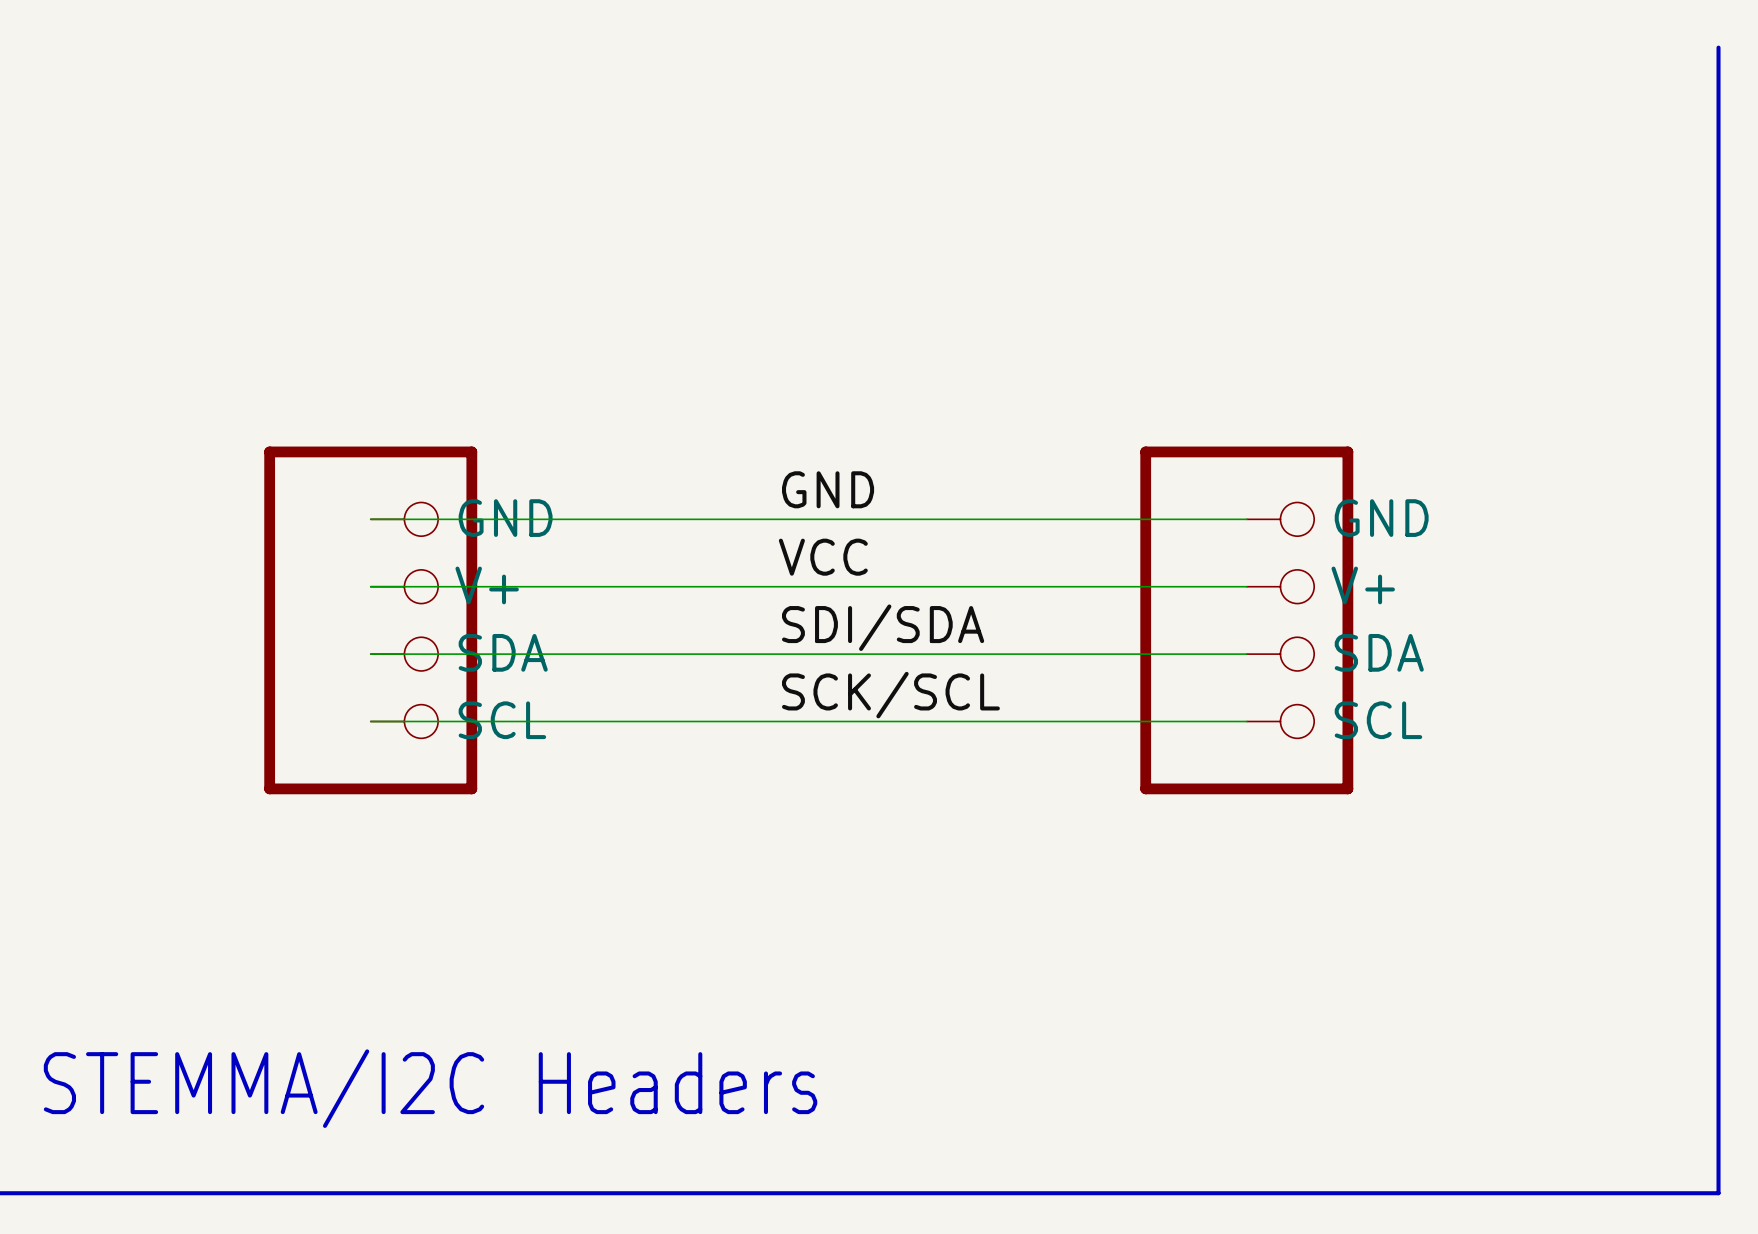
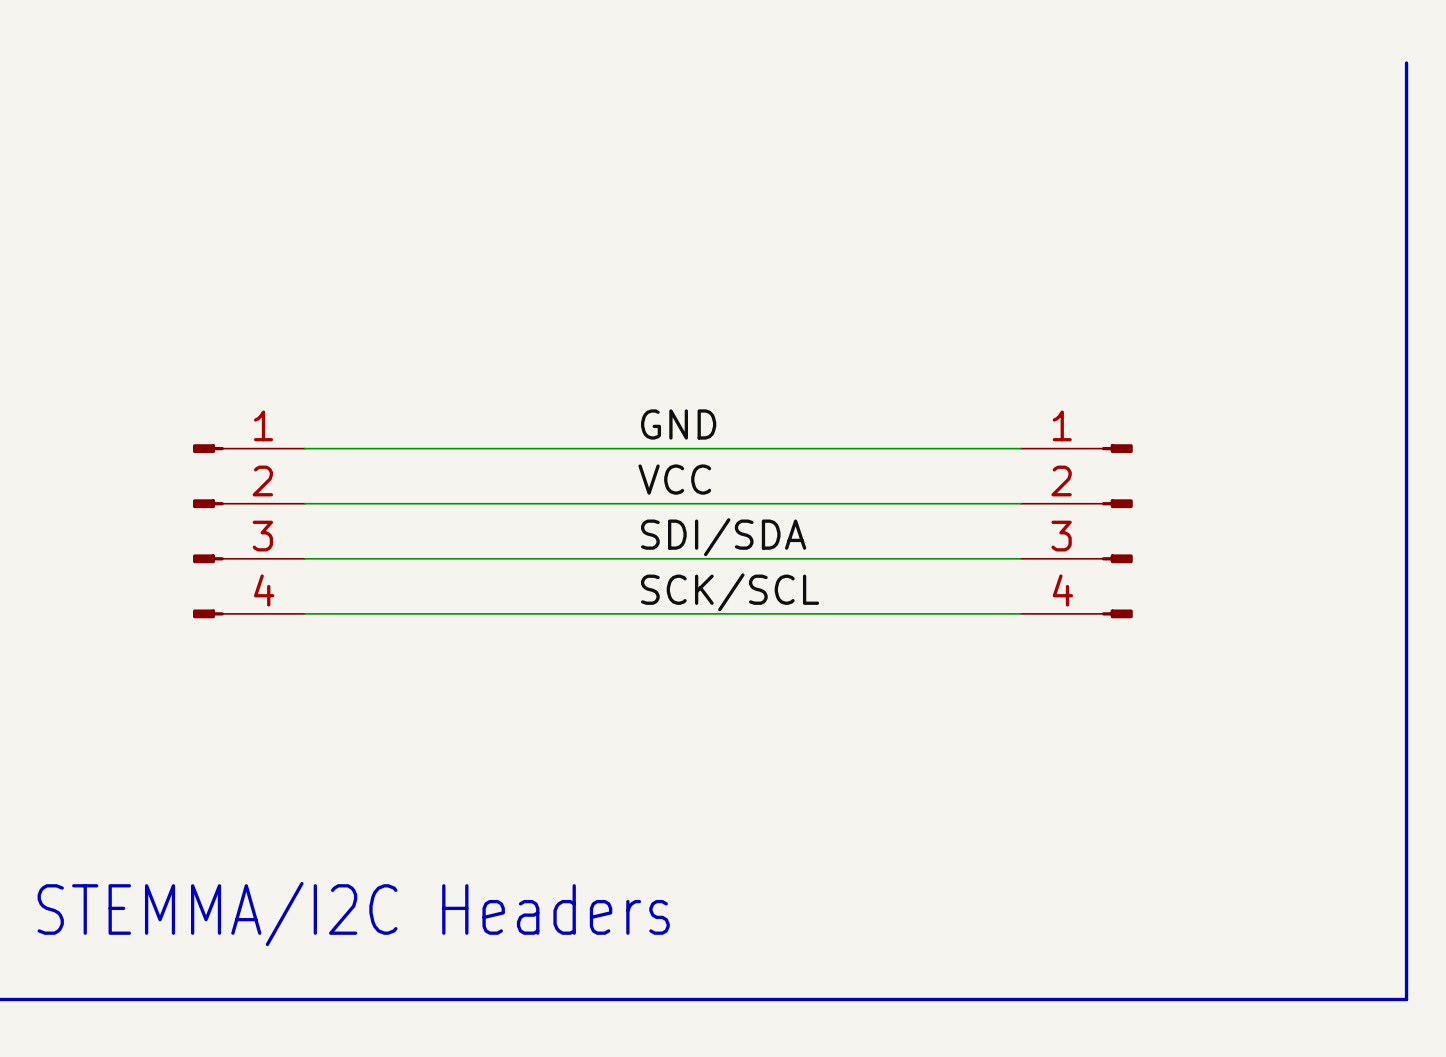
part: none -> (248, 531)
part: (370, 620) -> none
part: (1246, 620) -> none
part: none -> (1076, 531)

